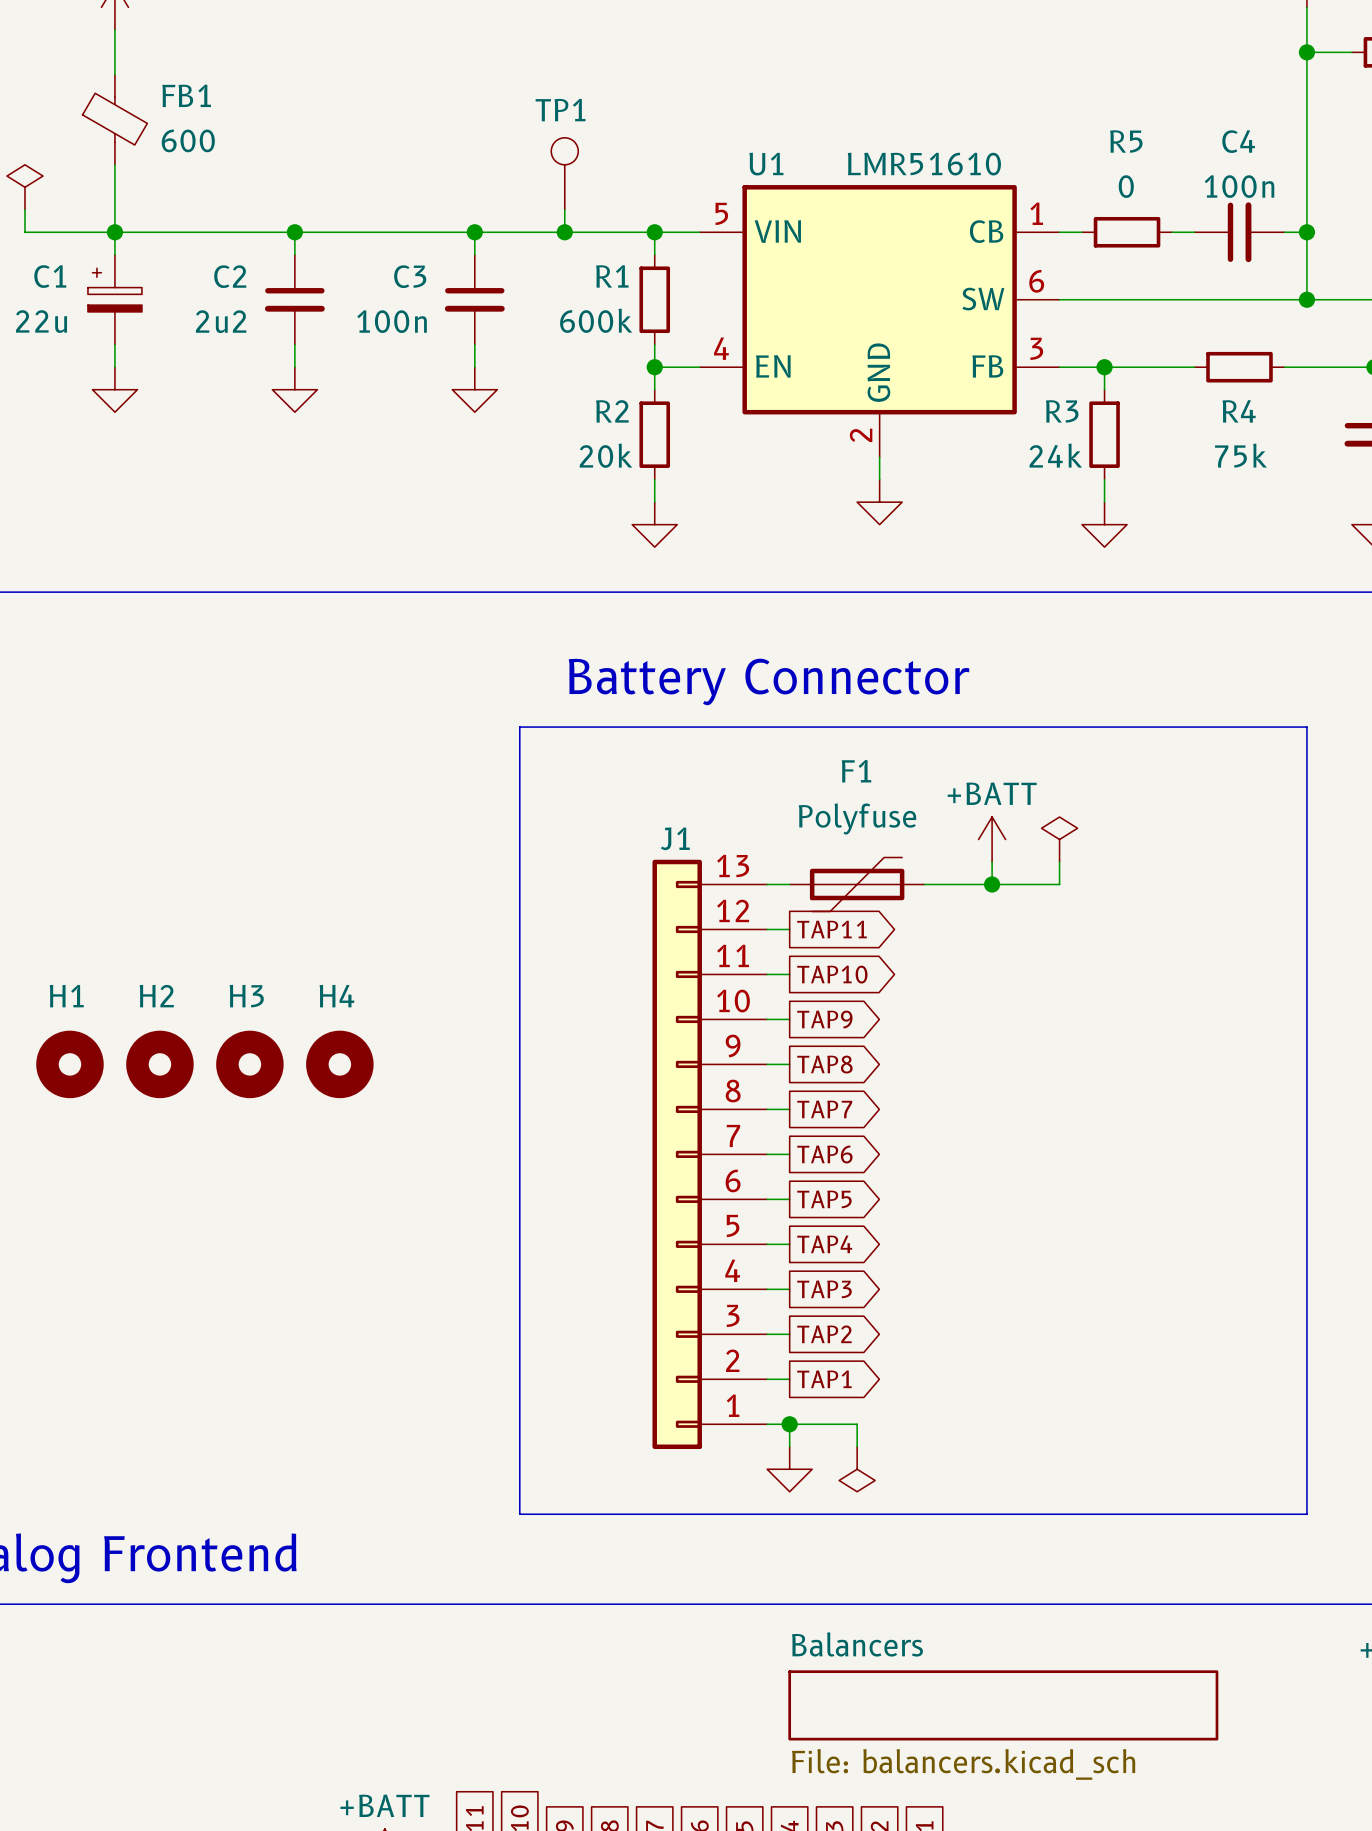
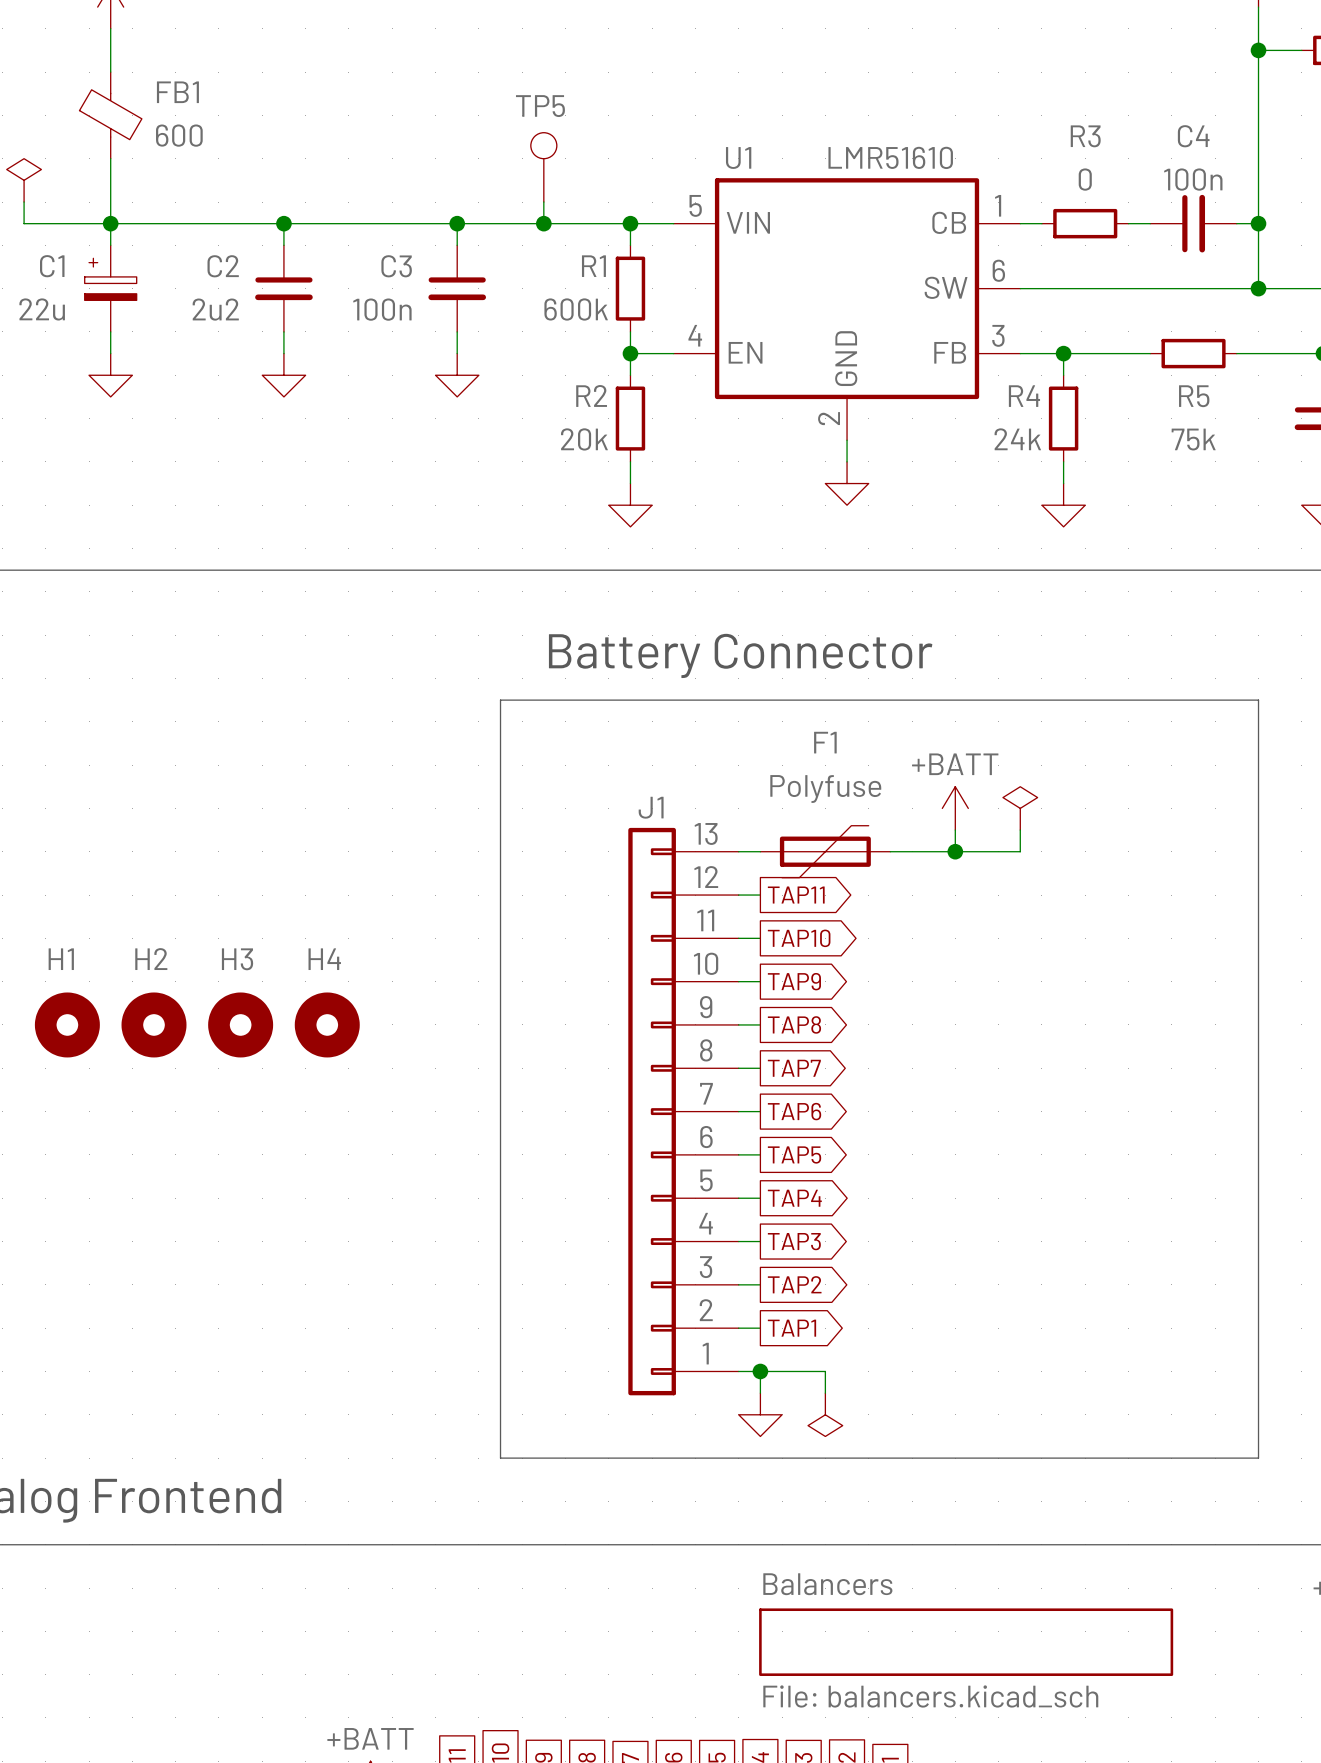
TP1 name: TP1 (560, 110) -> TP5 (540, 106)
R5 name: R5 (1126, 141) -> R3 (1085, 136)
R3 name: R3 (1062, 411) -> R4 (1024, 396)
R4 name: R4 (1239, 411) -> R5 (1194, 396)

